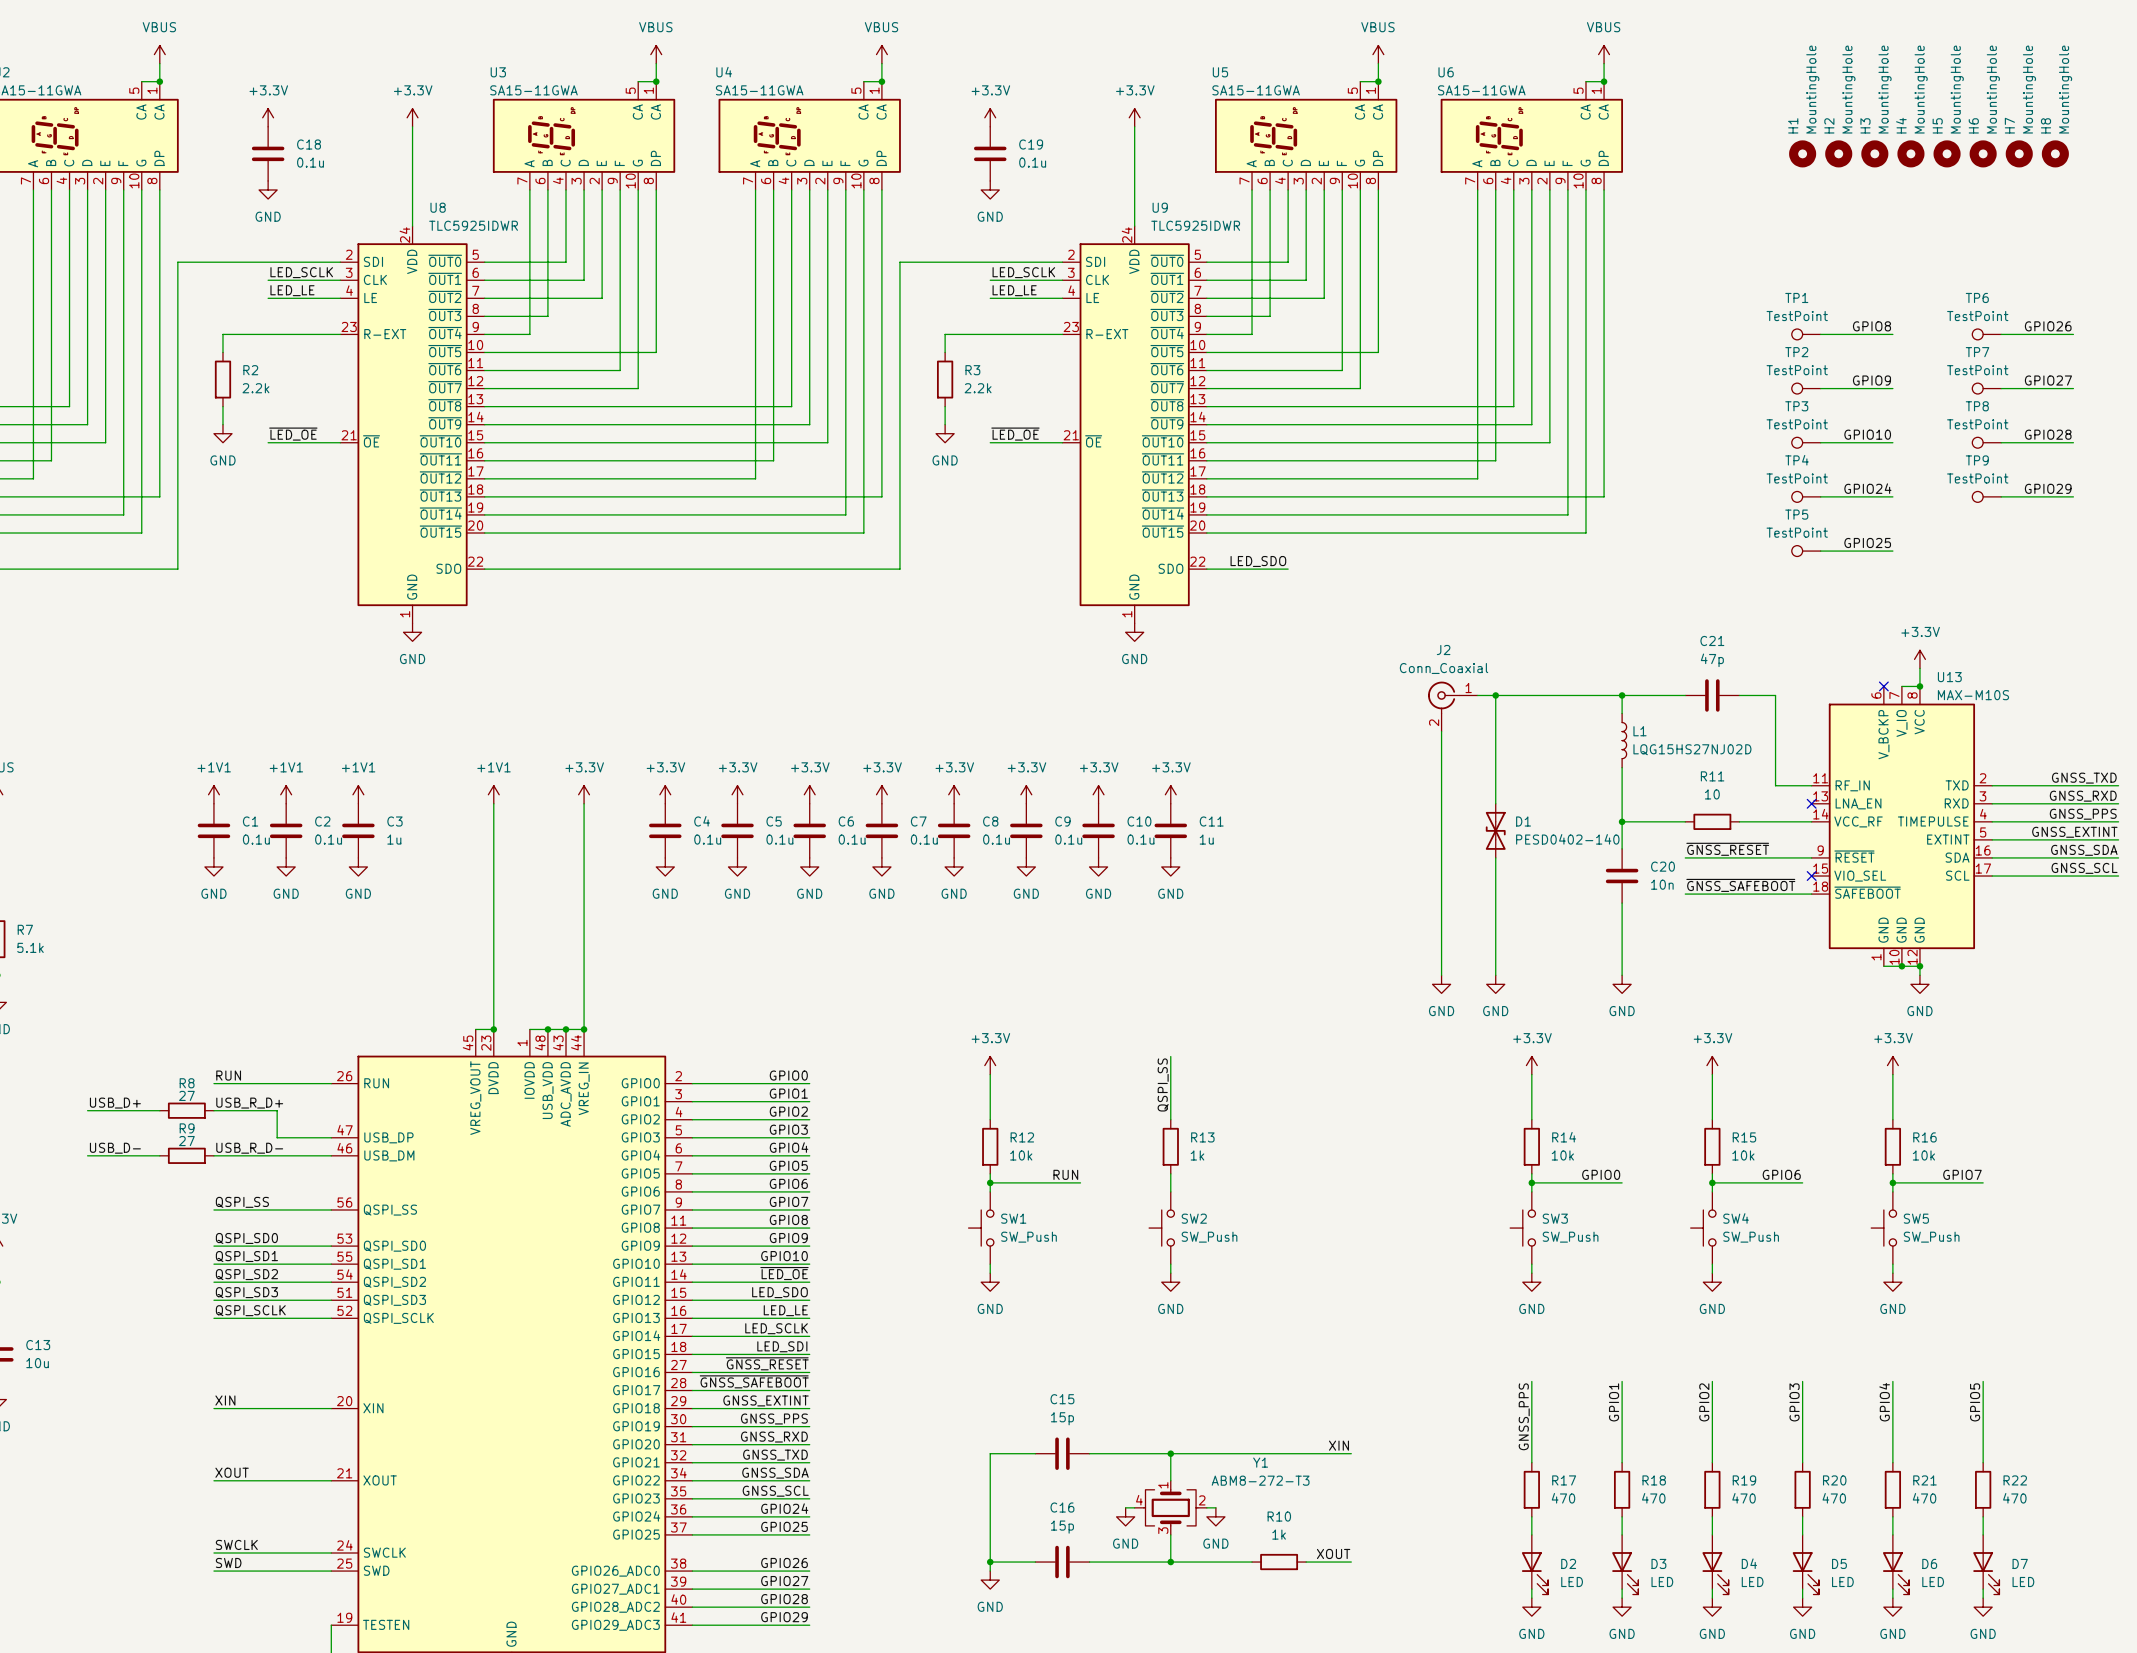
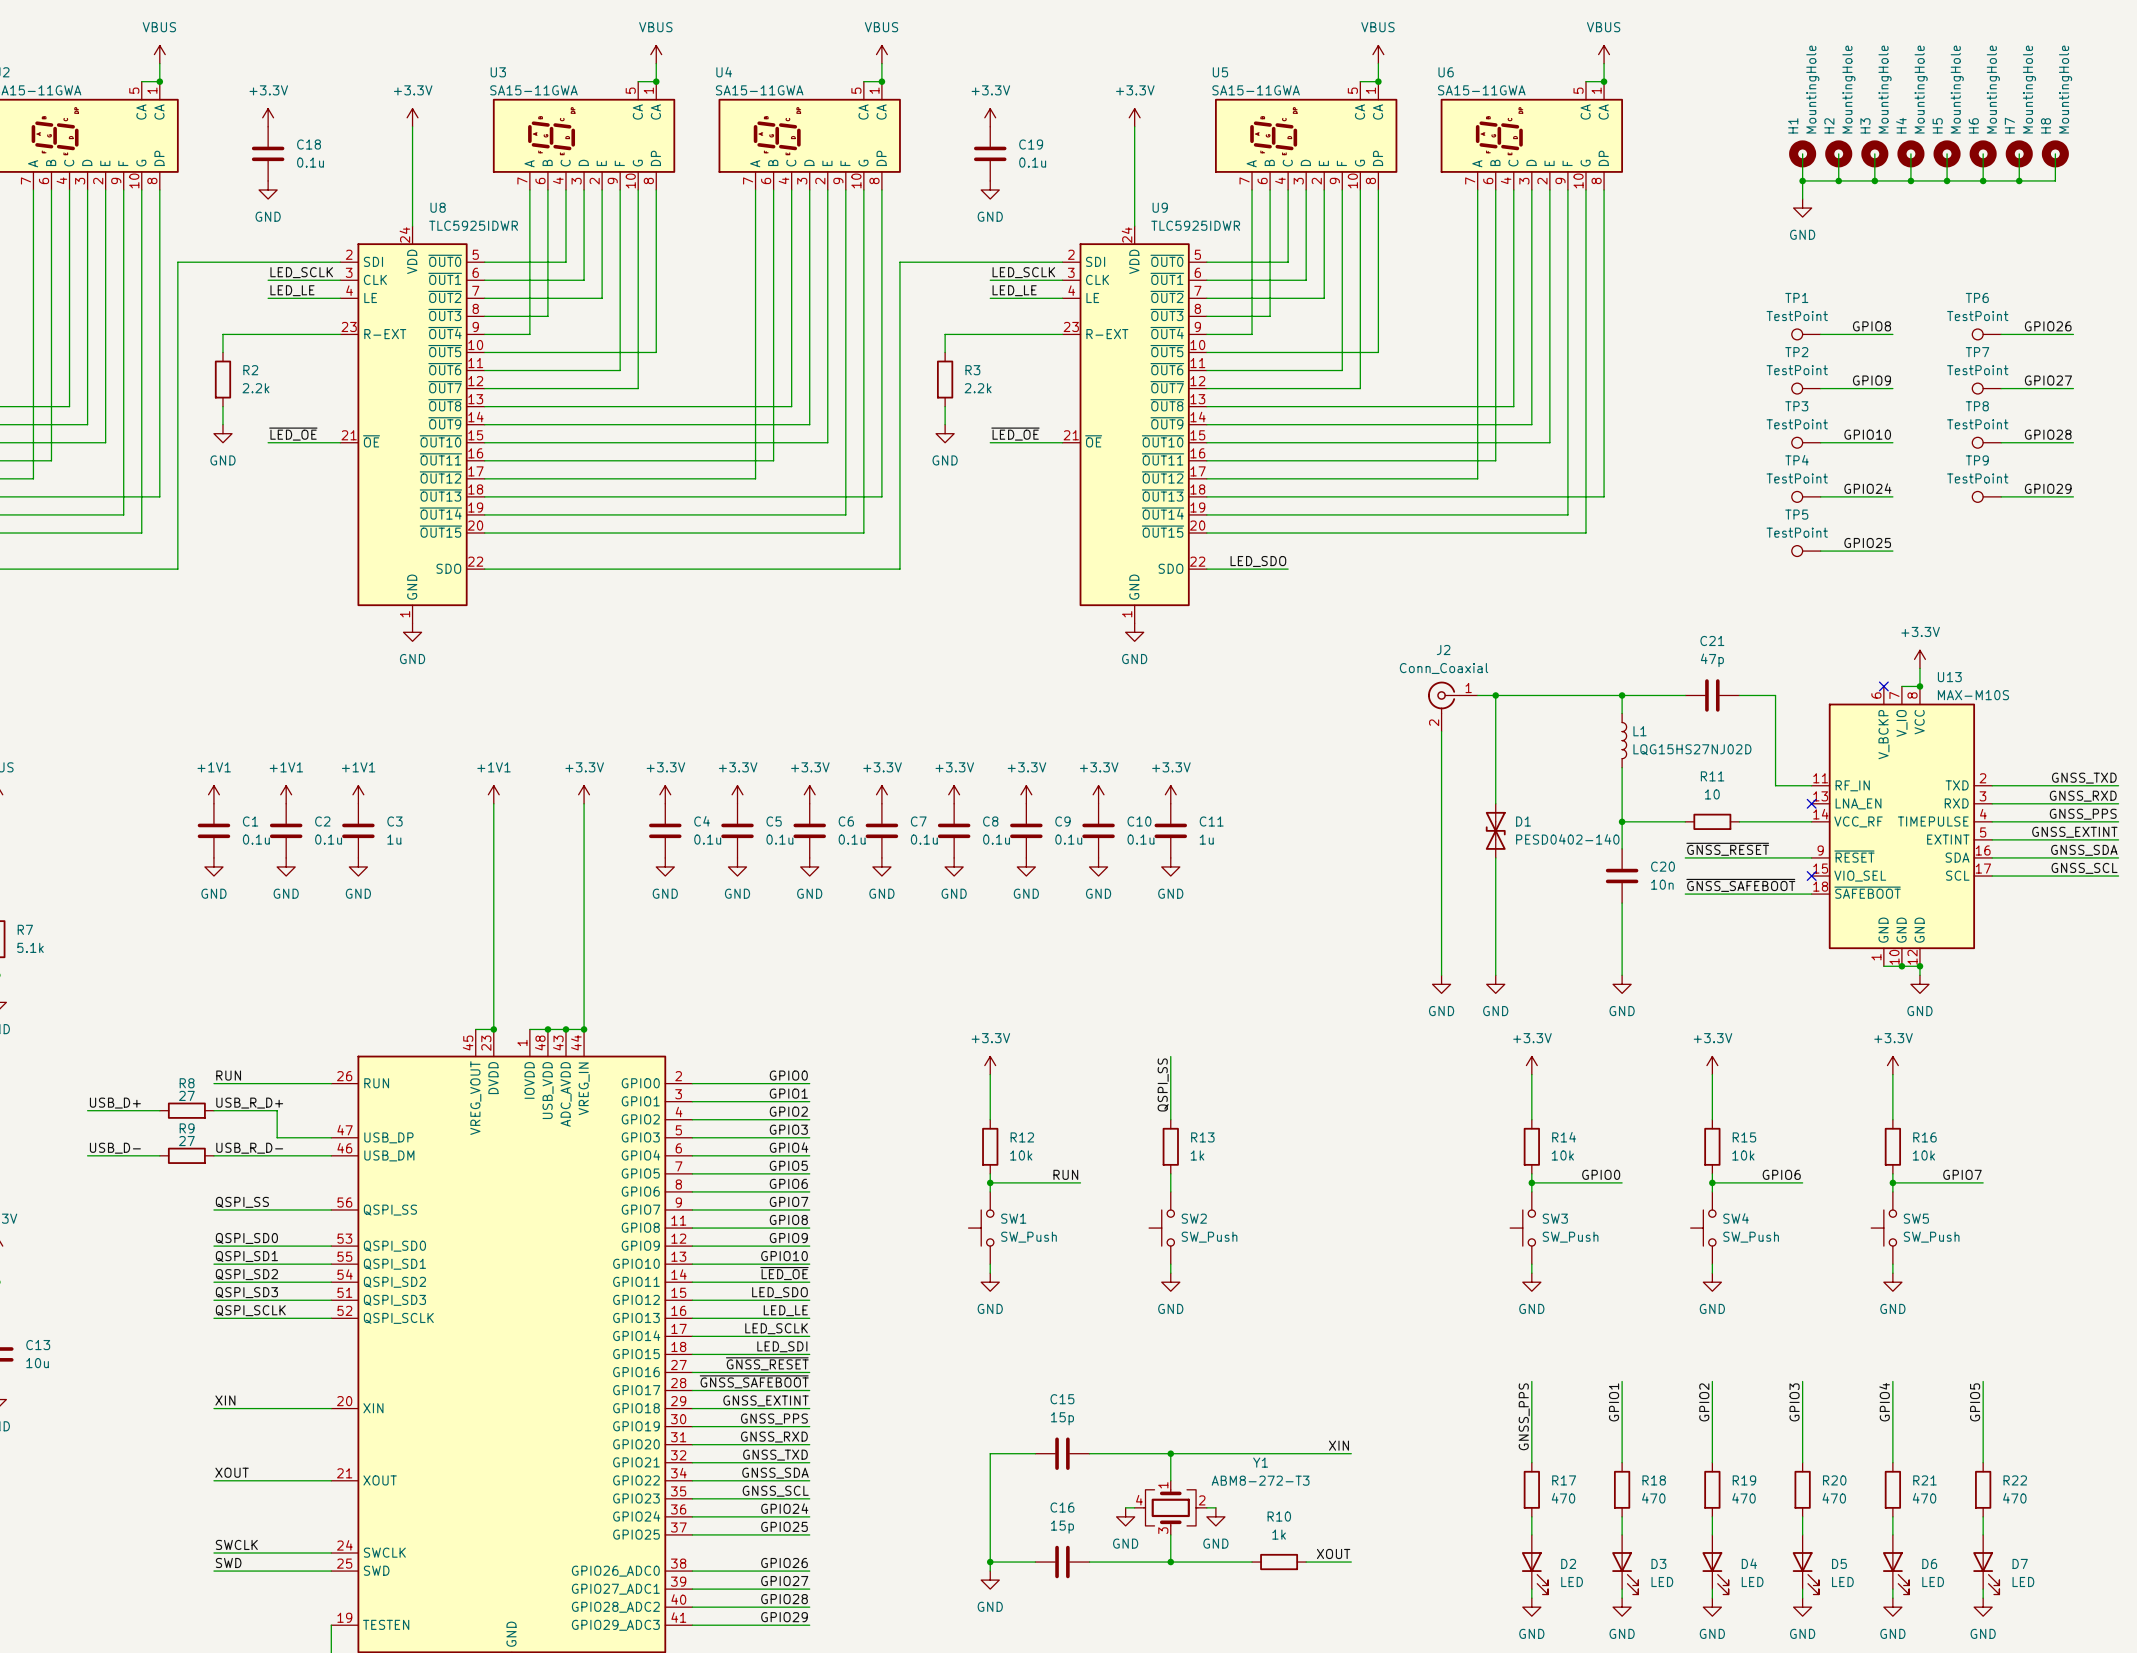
wire: none -> (1802, 153) (1802, 199)
wire: none -> (1838, 153) (1838, 180)
wire: none -> (1874, 153) (1874, 180)
wire: none -> (1910, 153) (1910, 180)
wire: none -> (1947, 153) (1947, 180)
wire: none -> (1983, 153) (1983, 180)
wire: none -> (2019, 153) (2019, 180)
wire: none -> (2055, 153) (2055, 180) (1802, 180)
junction: none -> (1802, 180)
junction: none -> (1838, 180)
junction: none -> (1874, 180)
junction: none -> (1910, 180)
junction: none -> (1947, 180)
junction: none -> (1983, 180)
junction: none -> (2019, 180)
power symbol: none -> GND (1802, 208)

